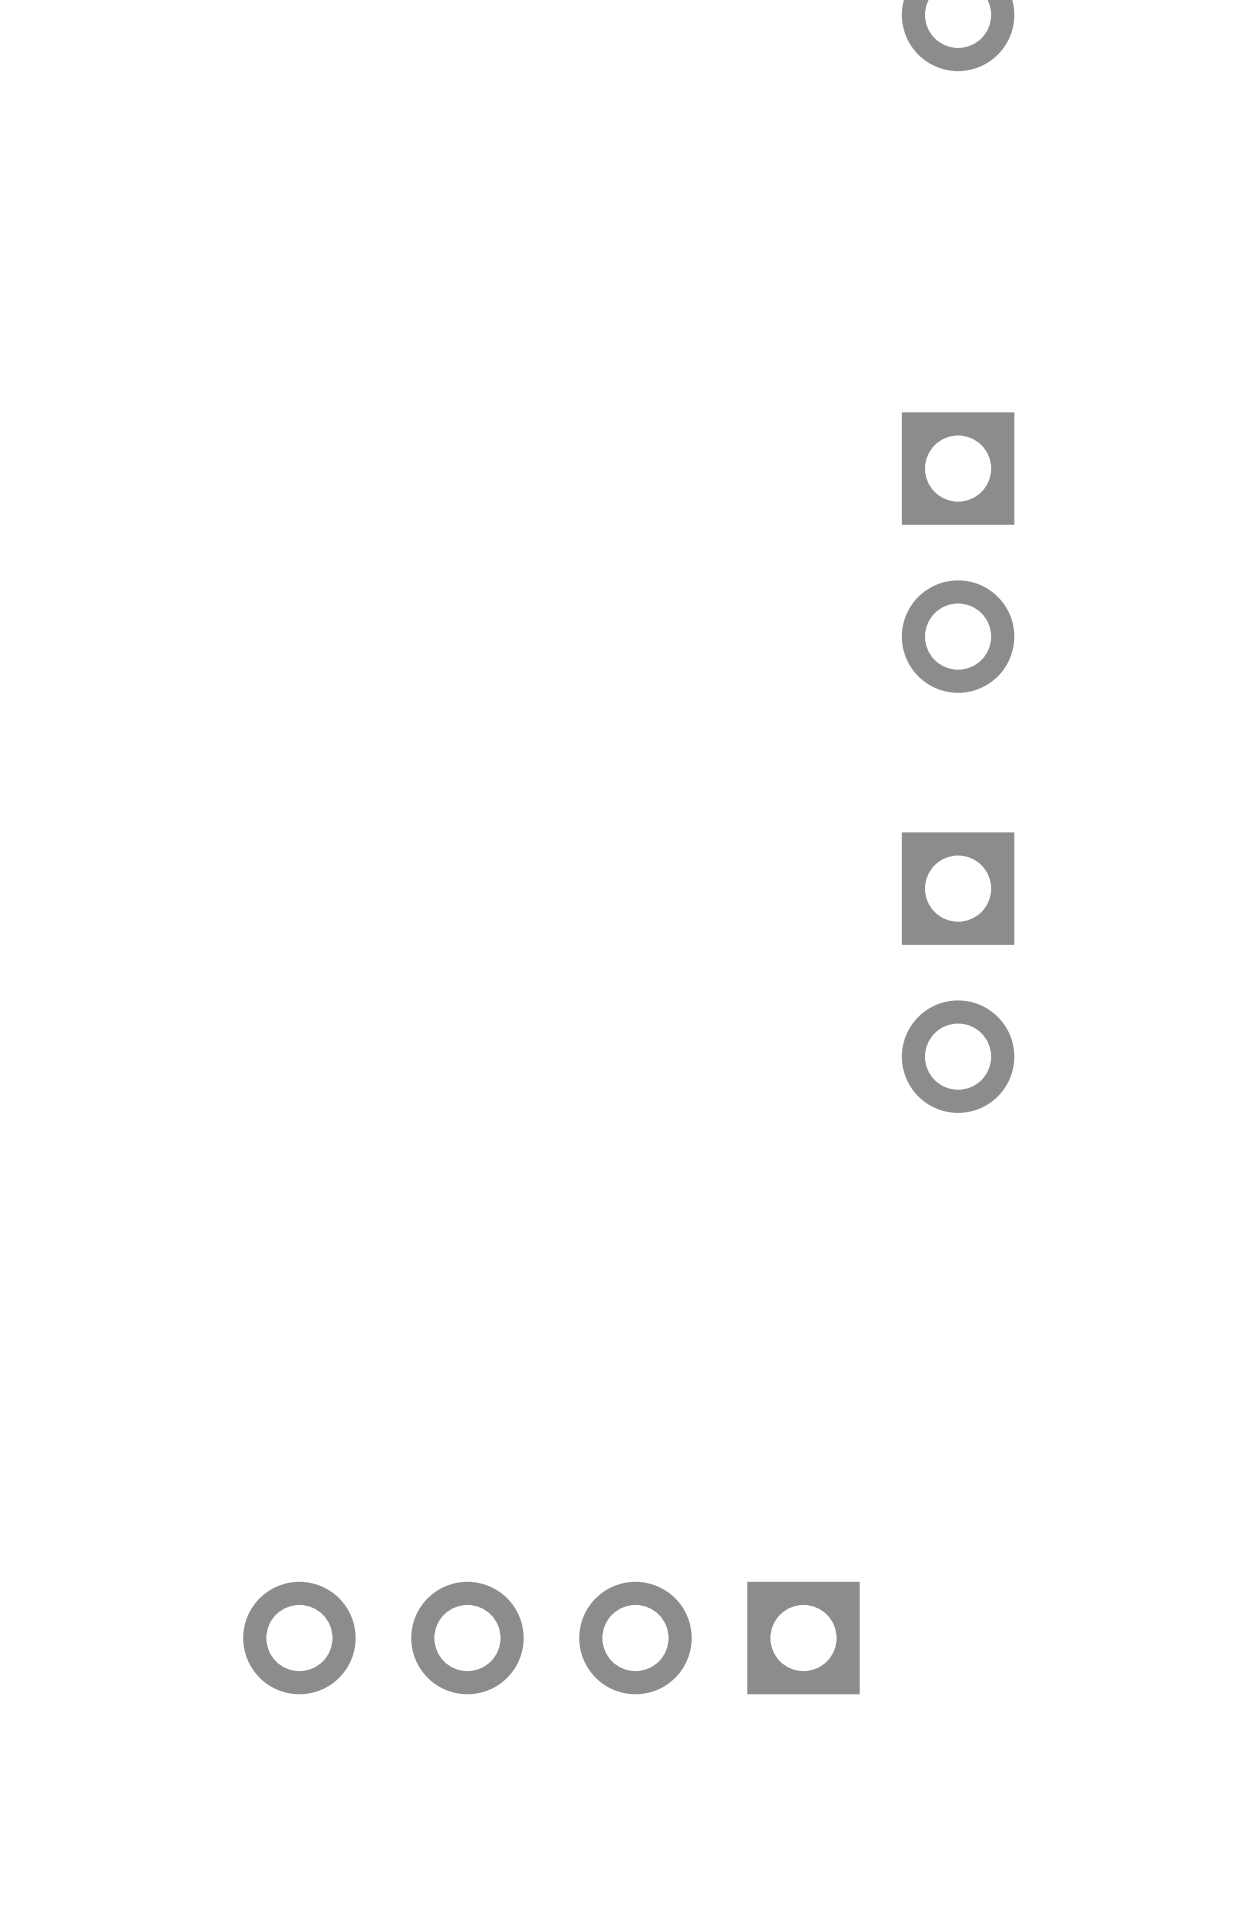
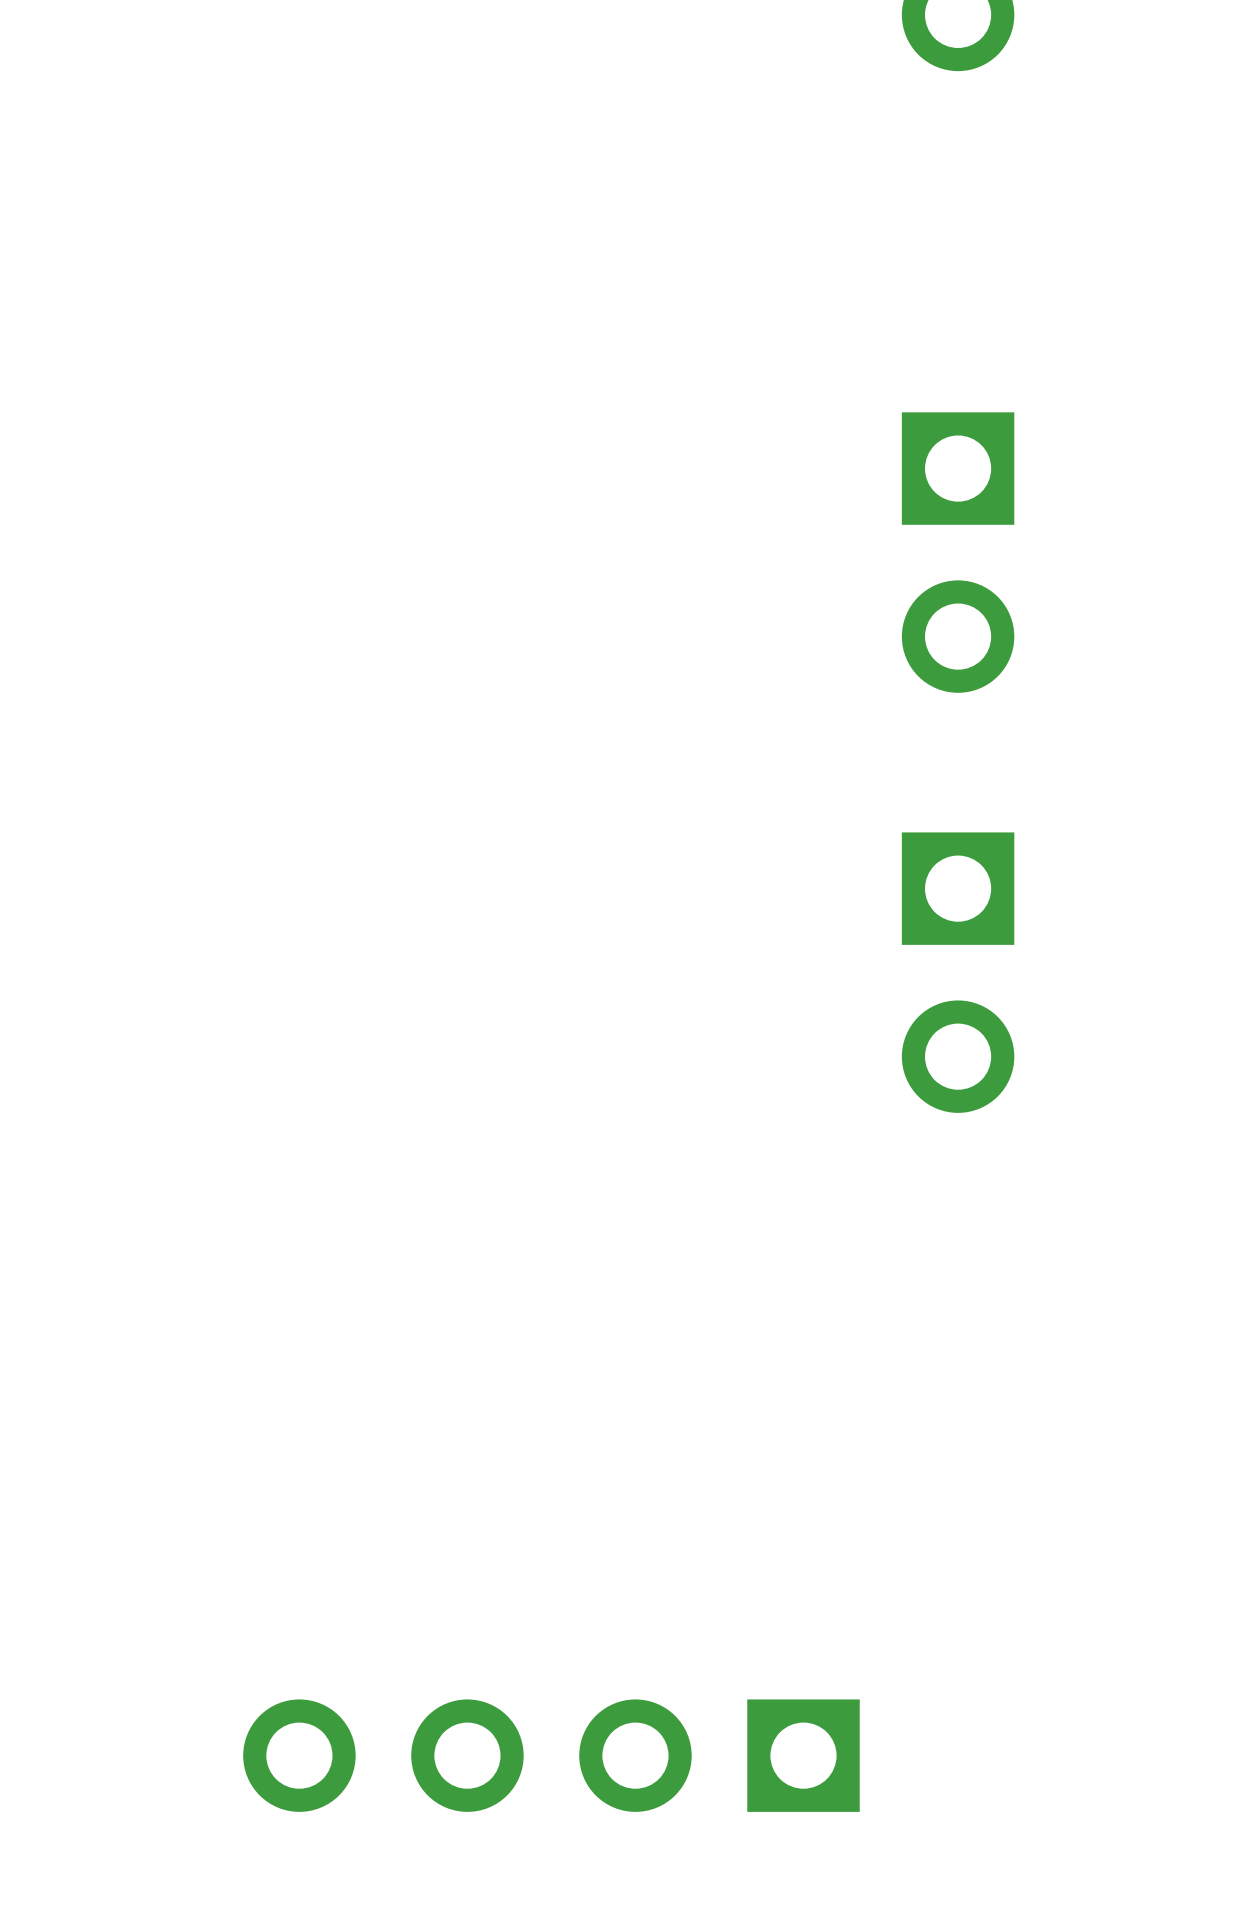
part position: (551, 1638) -> (551, 1755)

